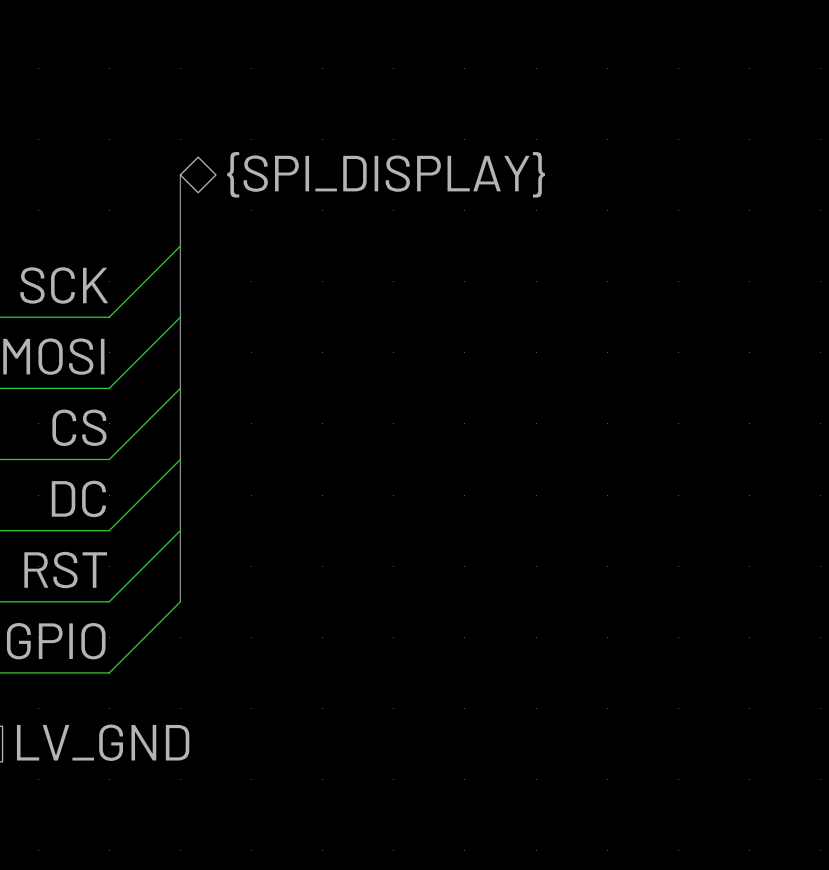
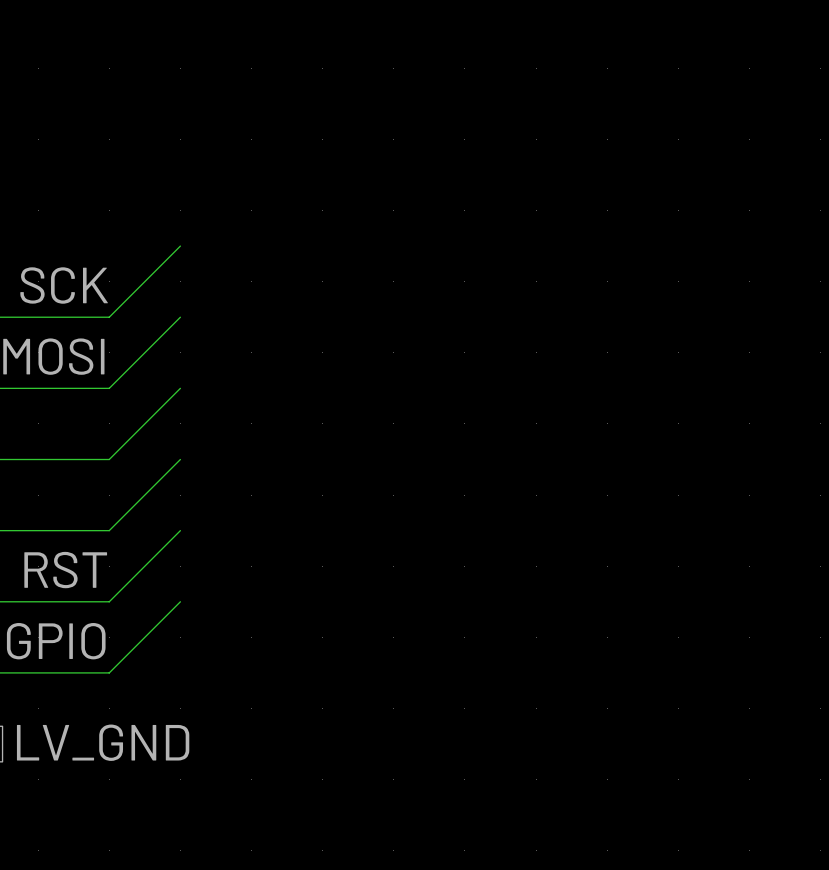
bus: (180, 174) (180, 601) -> none
hierarchical label: {SPI_DISPLAY} (386, 174) -> none
label: CS (79, 427) -> none
label: DC (78, 498) -> none

